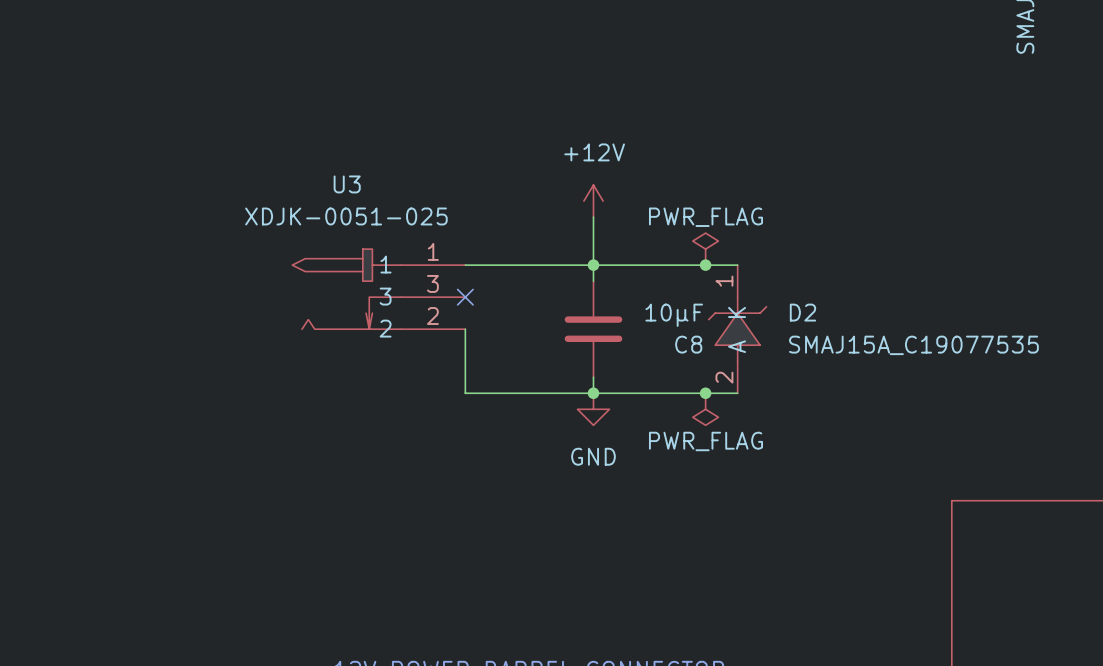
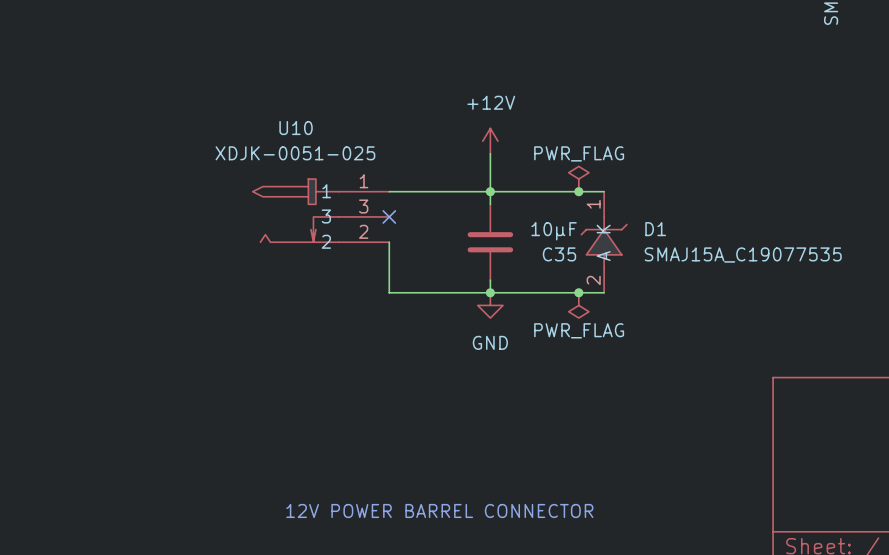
U3 name: U3 (347, 184) -> U10 (296, 128)
D2 name: D2 (802, 312) -> D1 (655, 229)
C8 name: C8 (688, 344) -> C35 (559, 254)

